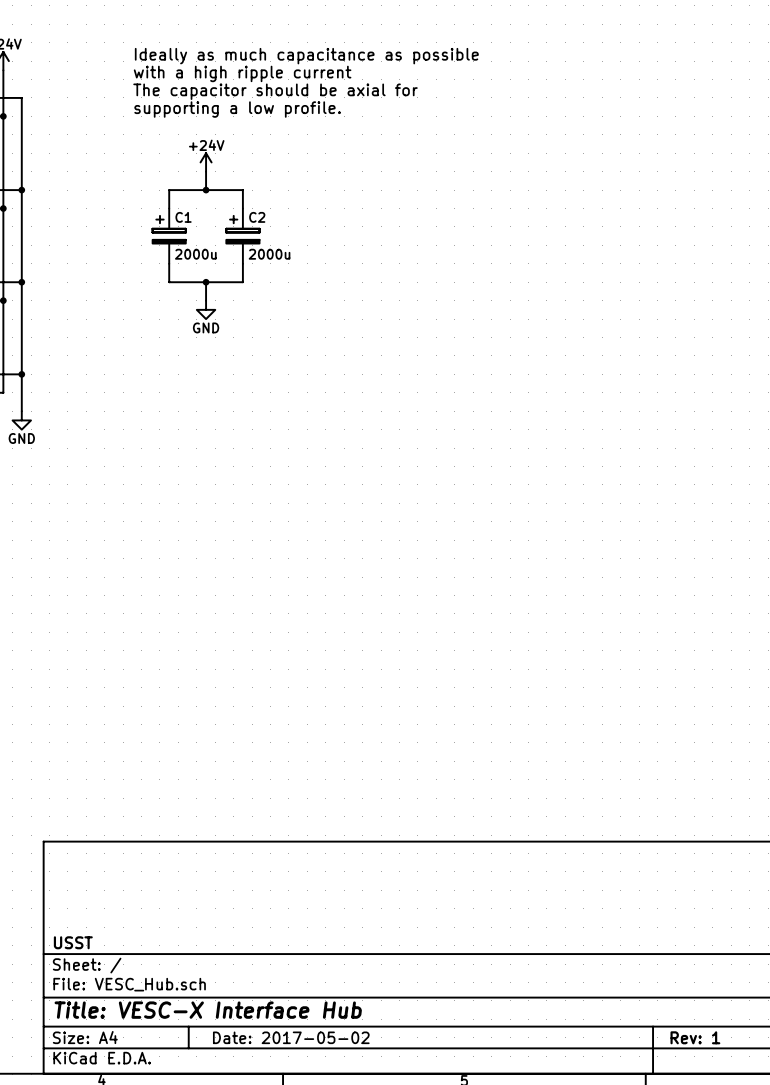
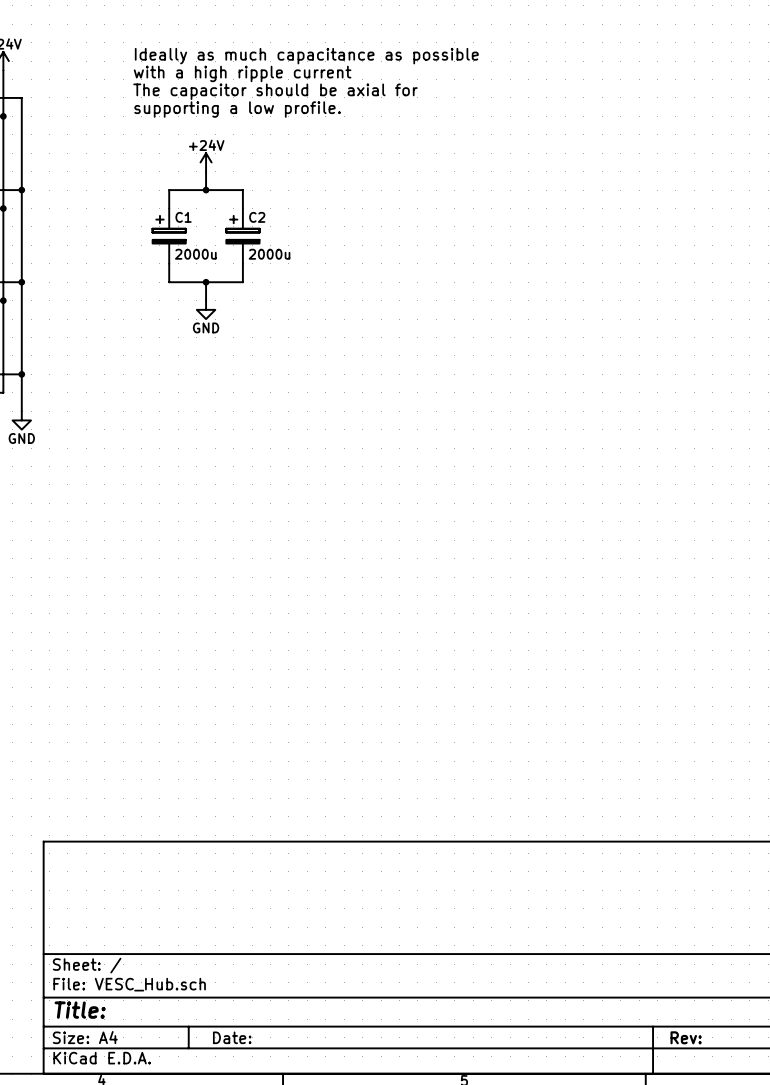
title block: USST (73, 942) -> none
title block: Title: VESC-X Interface Hub (208, 1010) -> Title: (80, 1010)
title block: Date: 2017-05-02 (291, 1037) -> Date: (232, 1037)
title block: Rev: 1 (695, 1037) -> Rev: (686, 1037)

